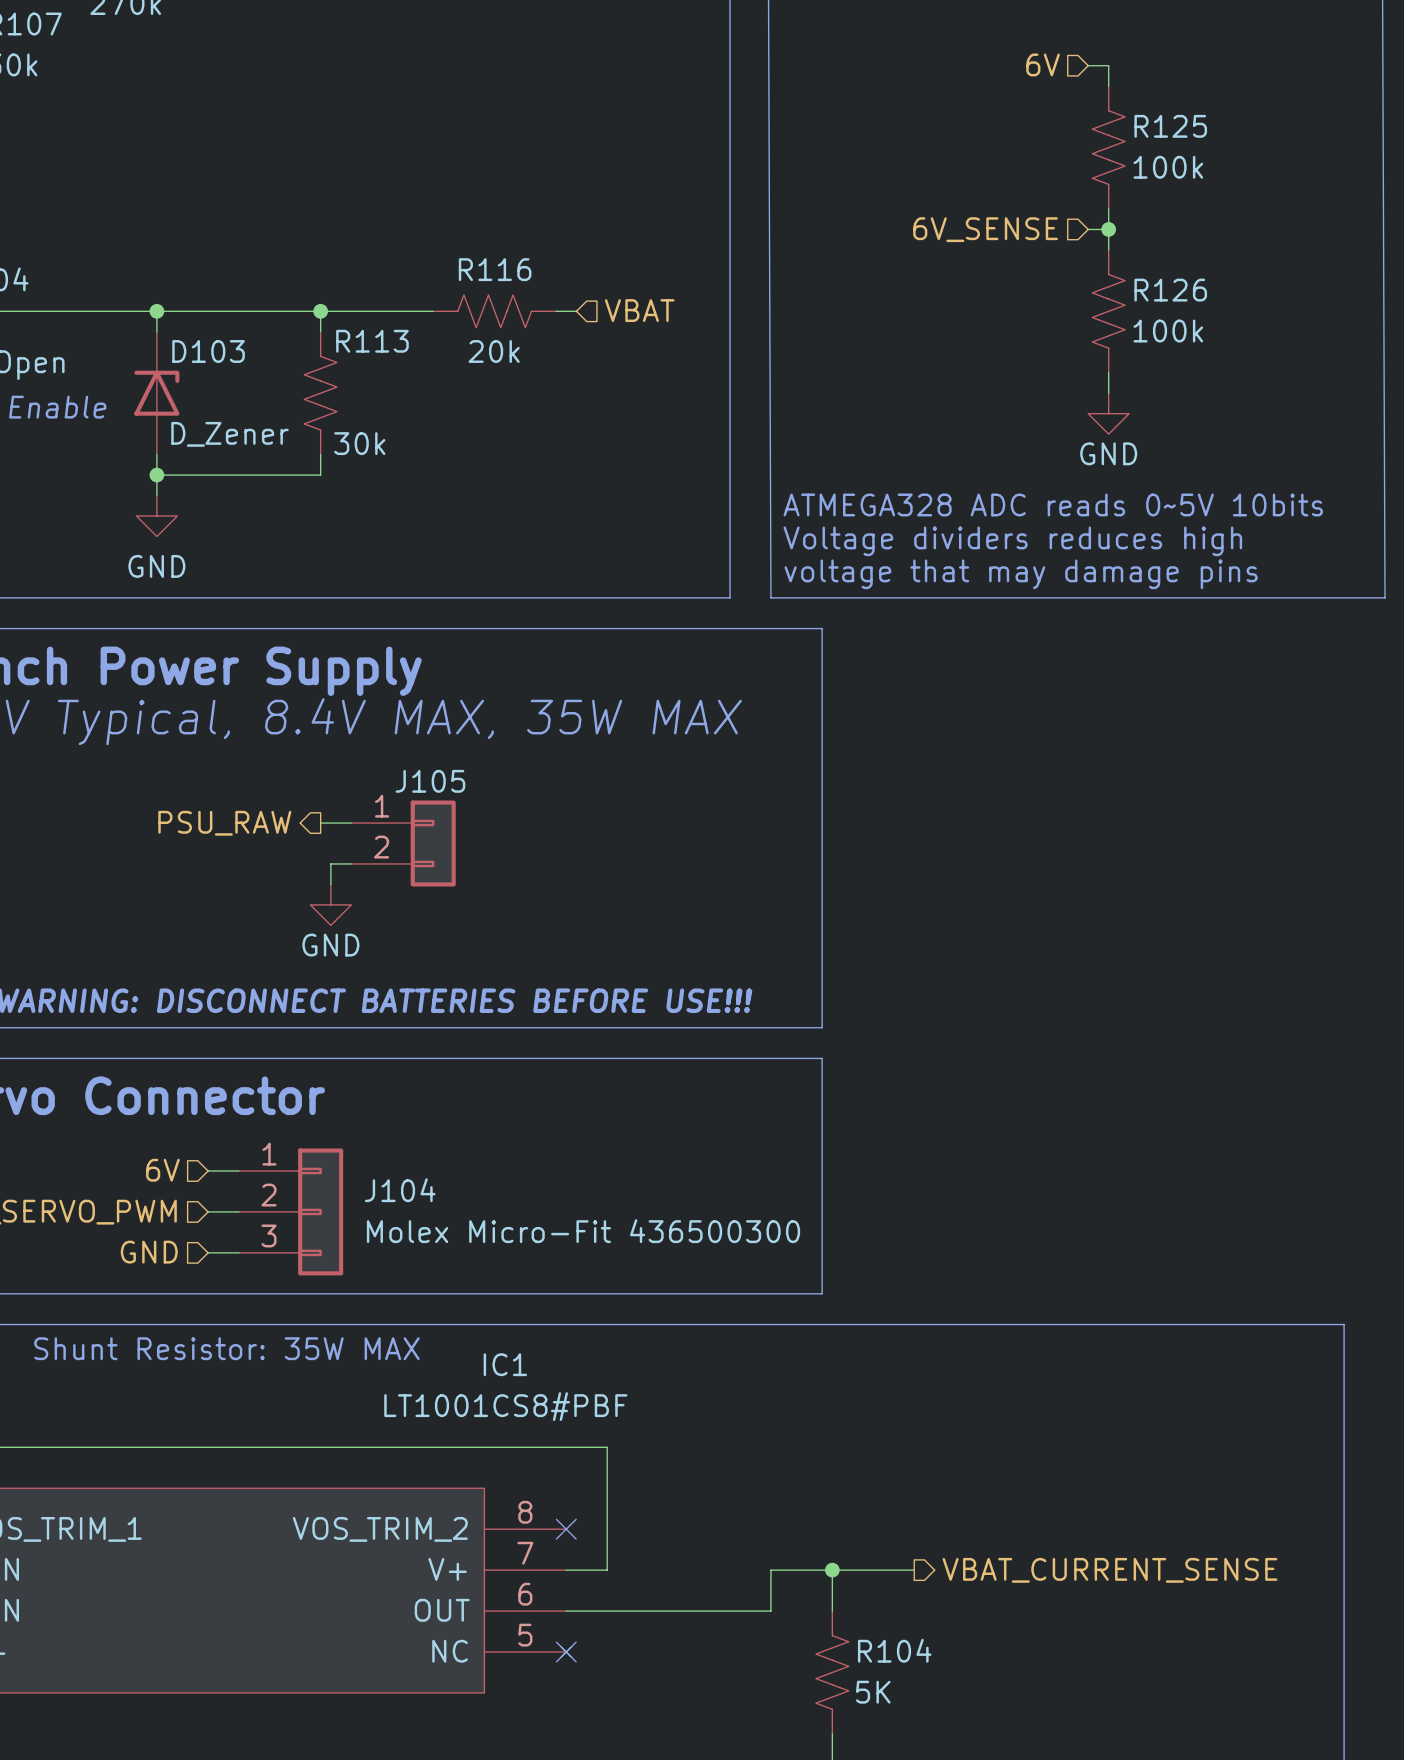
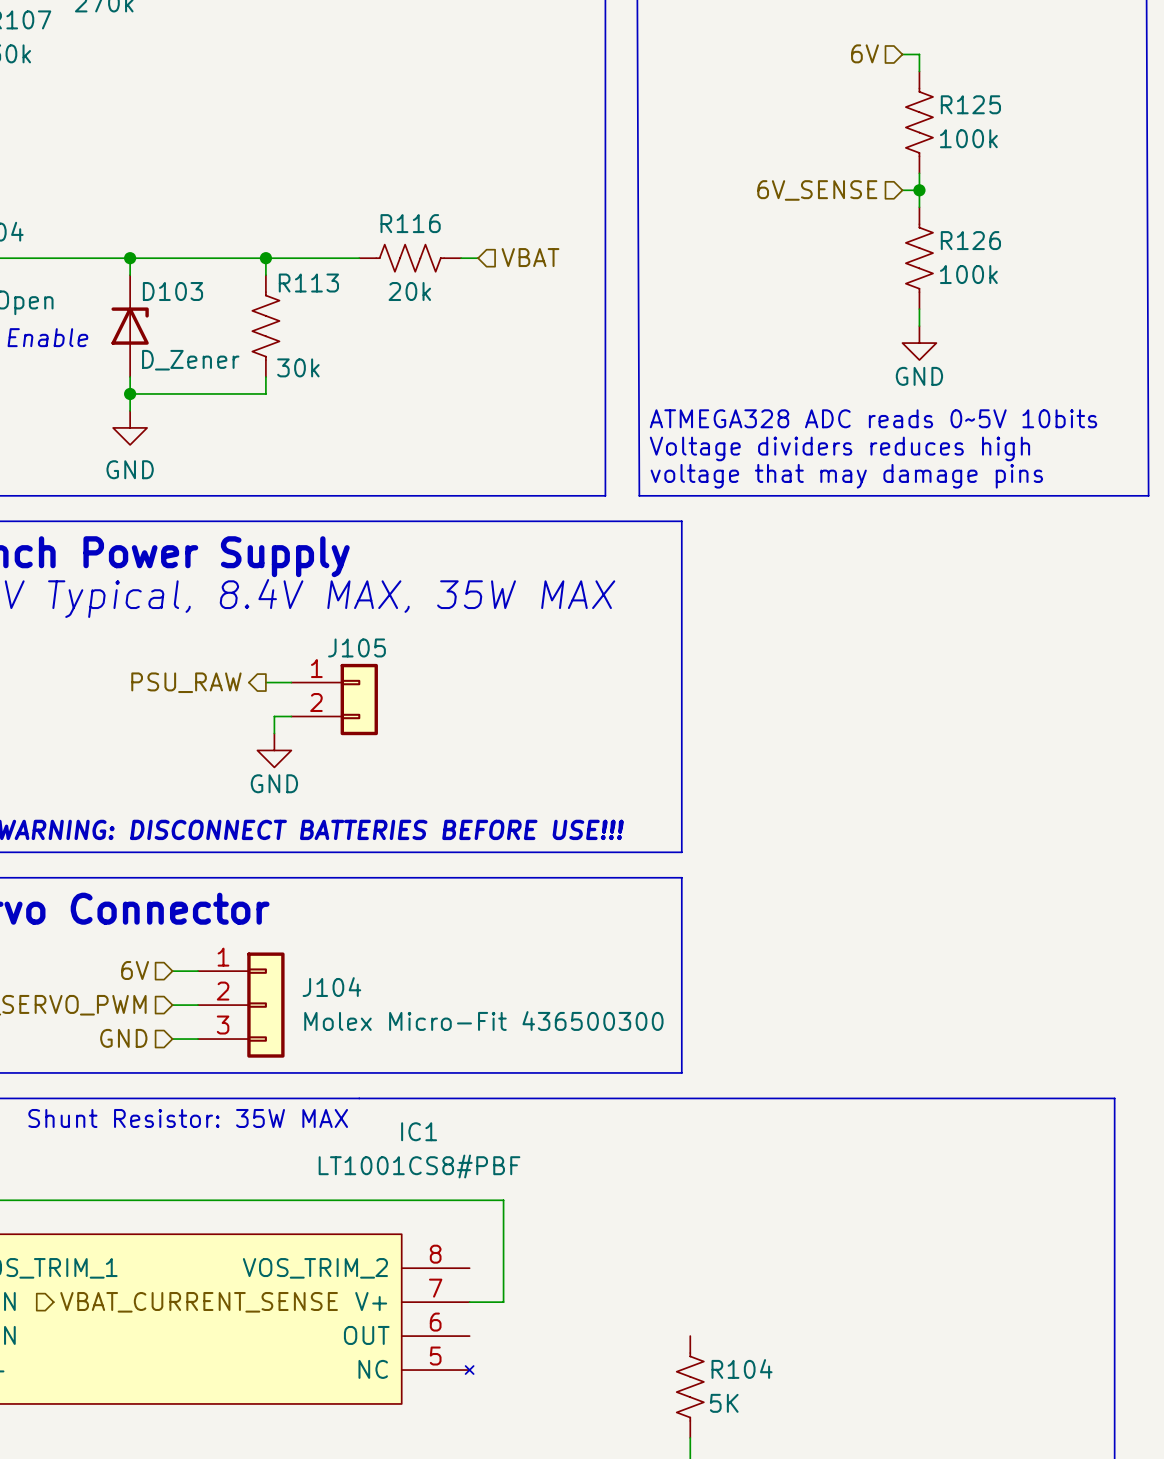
no-connect mark: (566, 1529) -> none
hierarchical label: none -> VBAT_CURRENT_SENSE (199, 1302)
wire: (832, 1570) (832, 1611) -> none
junction: (832, 1570) -> none
wire: (914, 1570) (770, 1570) (770, 1611) (566, 1611) -> none
hierarchical label: VBAT_CURRENT_SENSE (1109, 1570) -> none
no-connect mark: (566, 1652) -> none

